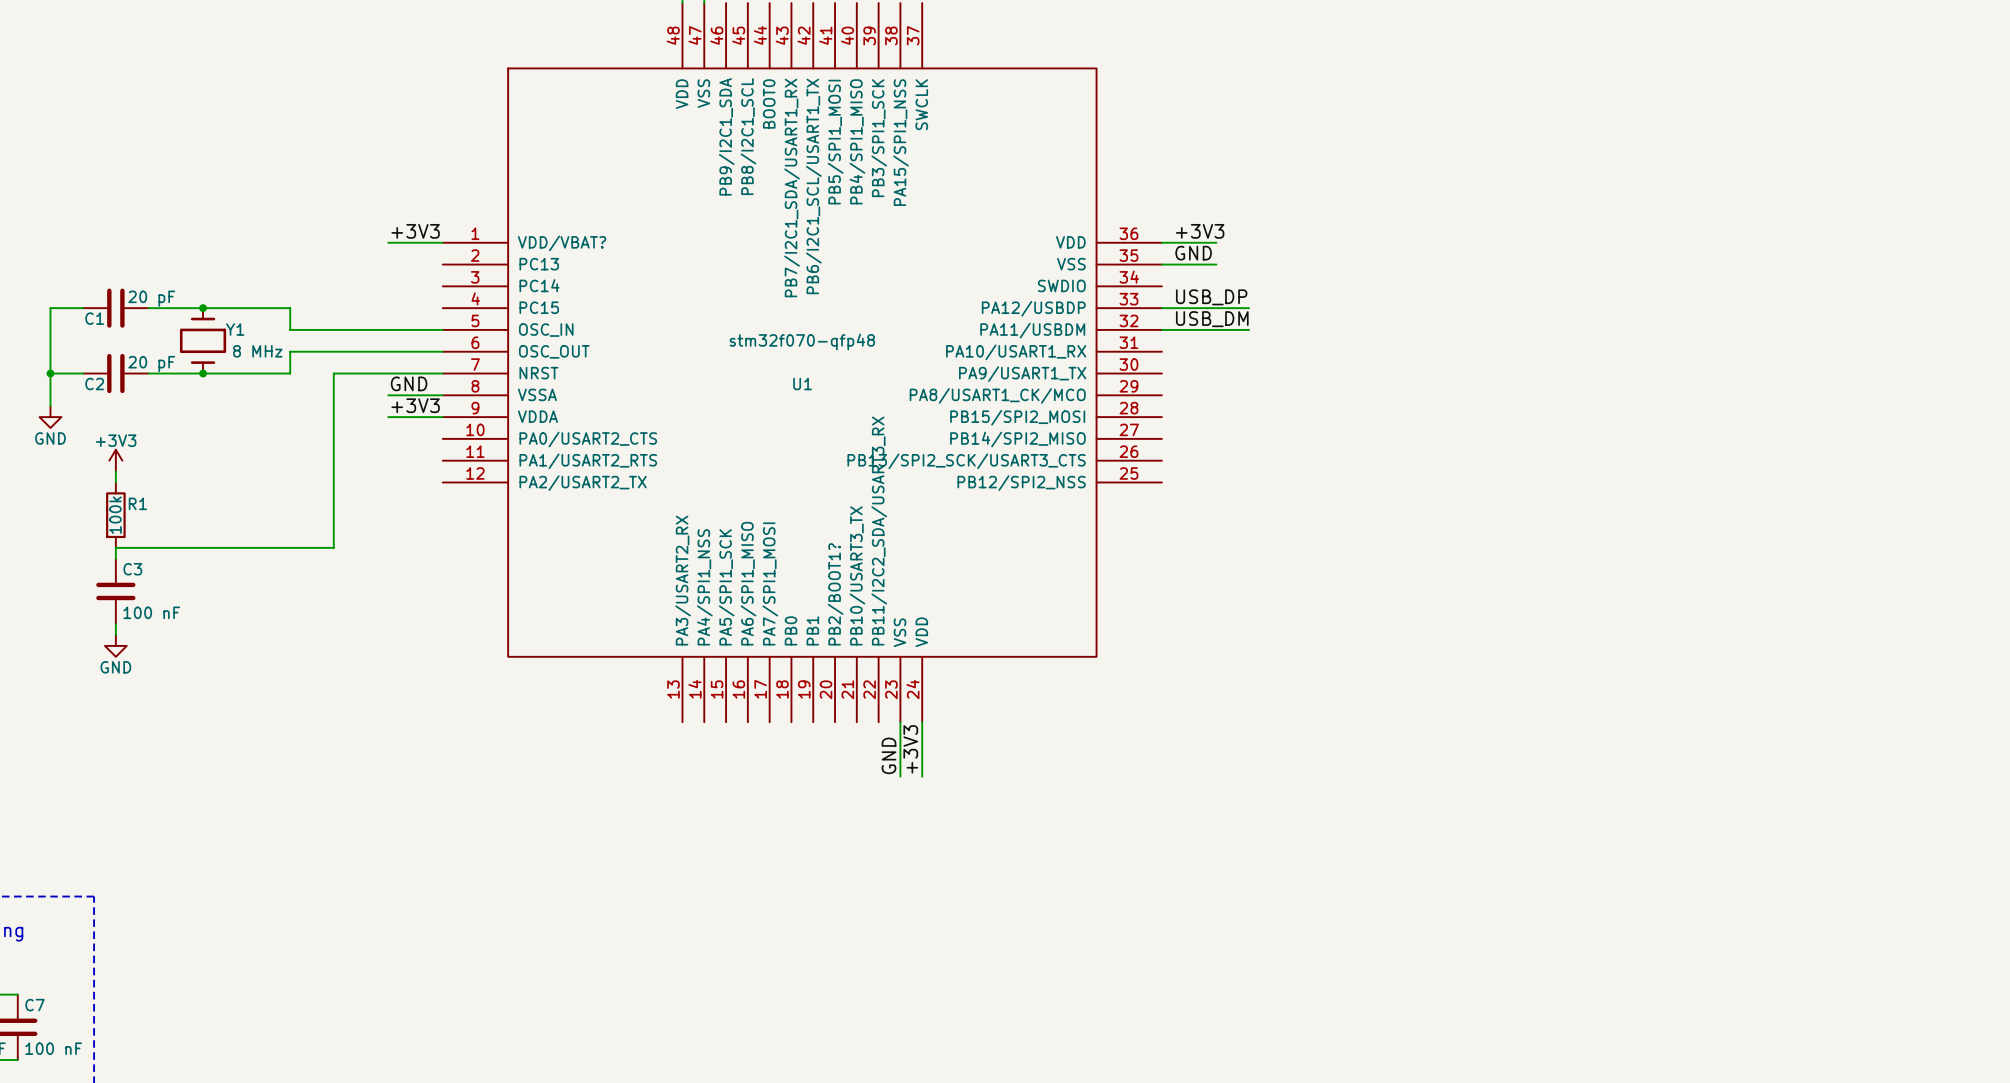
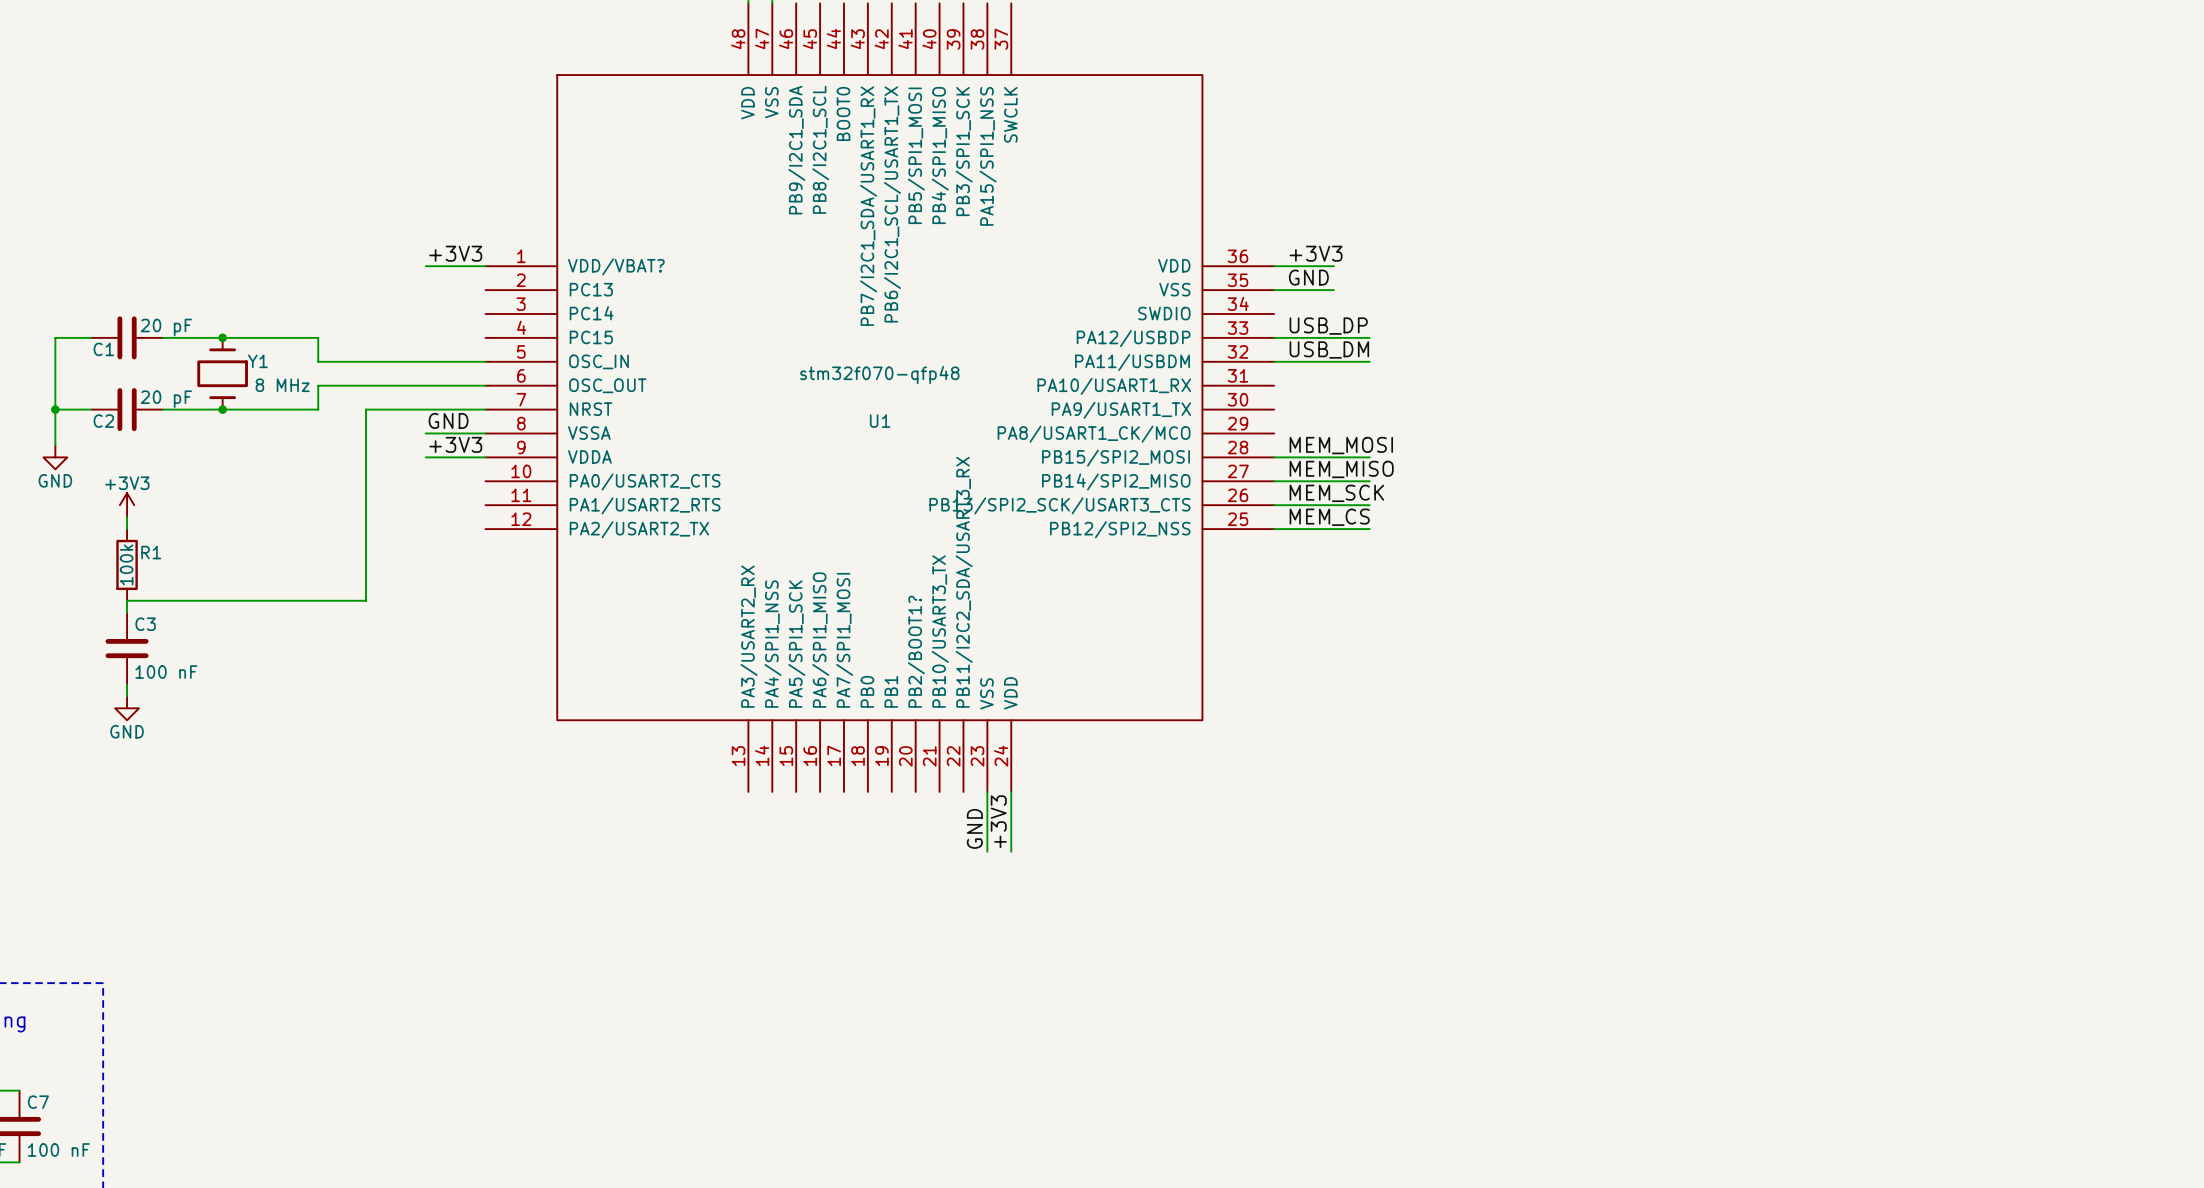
label: none -> MEM_MOSI (1341, 445)
wire: none -> (1274, 457) (1369, 457)
label: none -> MEM_MISO (1341, 469)
wire: none -> (1274, 481) (1369, 481)
label: none -> MEM_SCK (1336, 493)
wire: none -> (1274, 505) (1369, 505)
label: none -> MEM_CS (1329, 517)
wire: none -> (1274, 529) (1369, 529)

